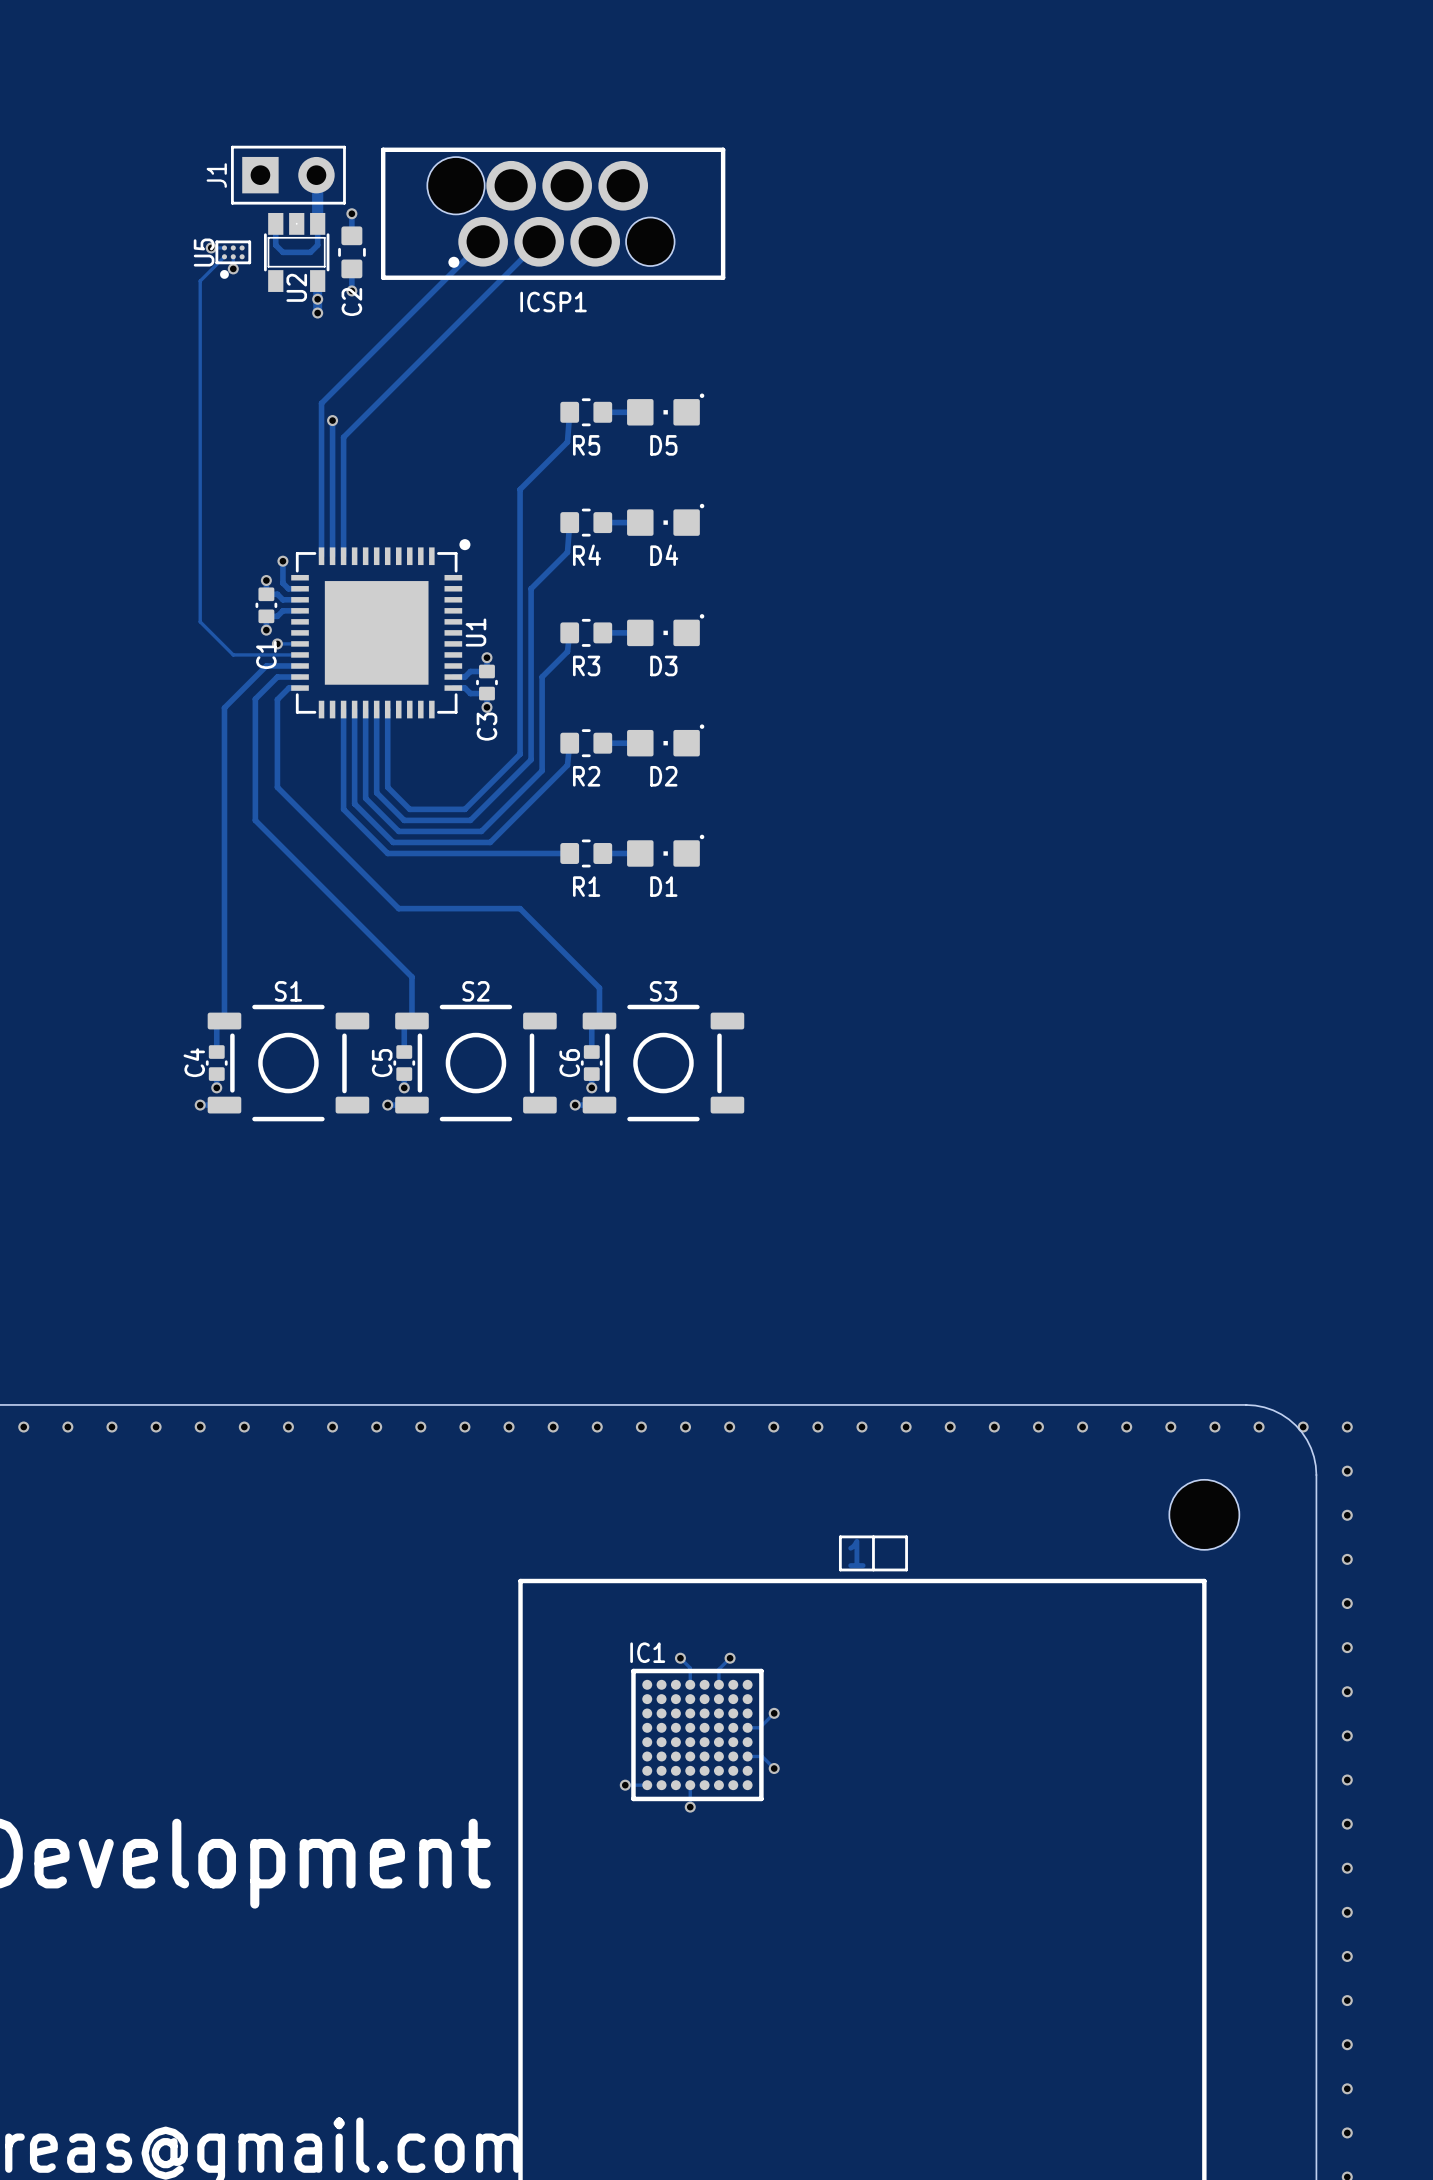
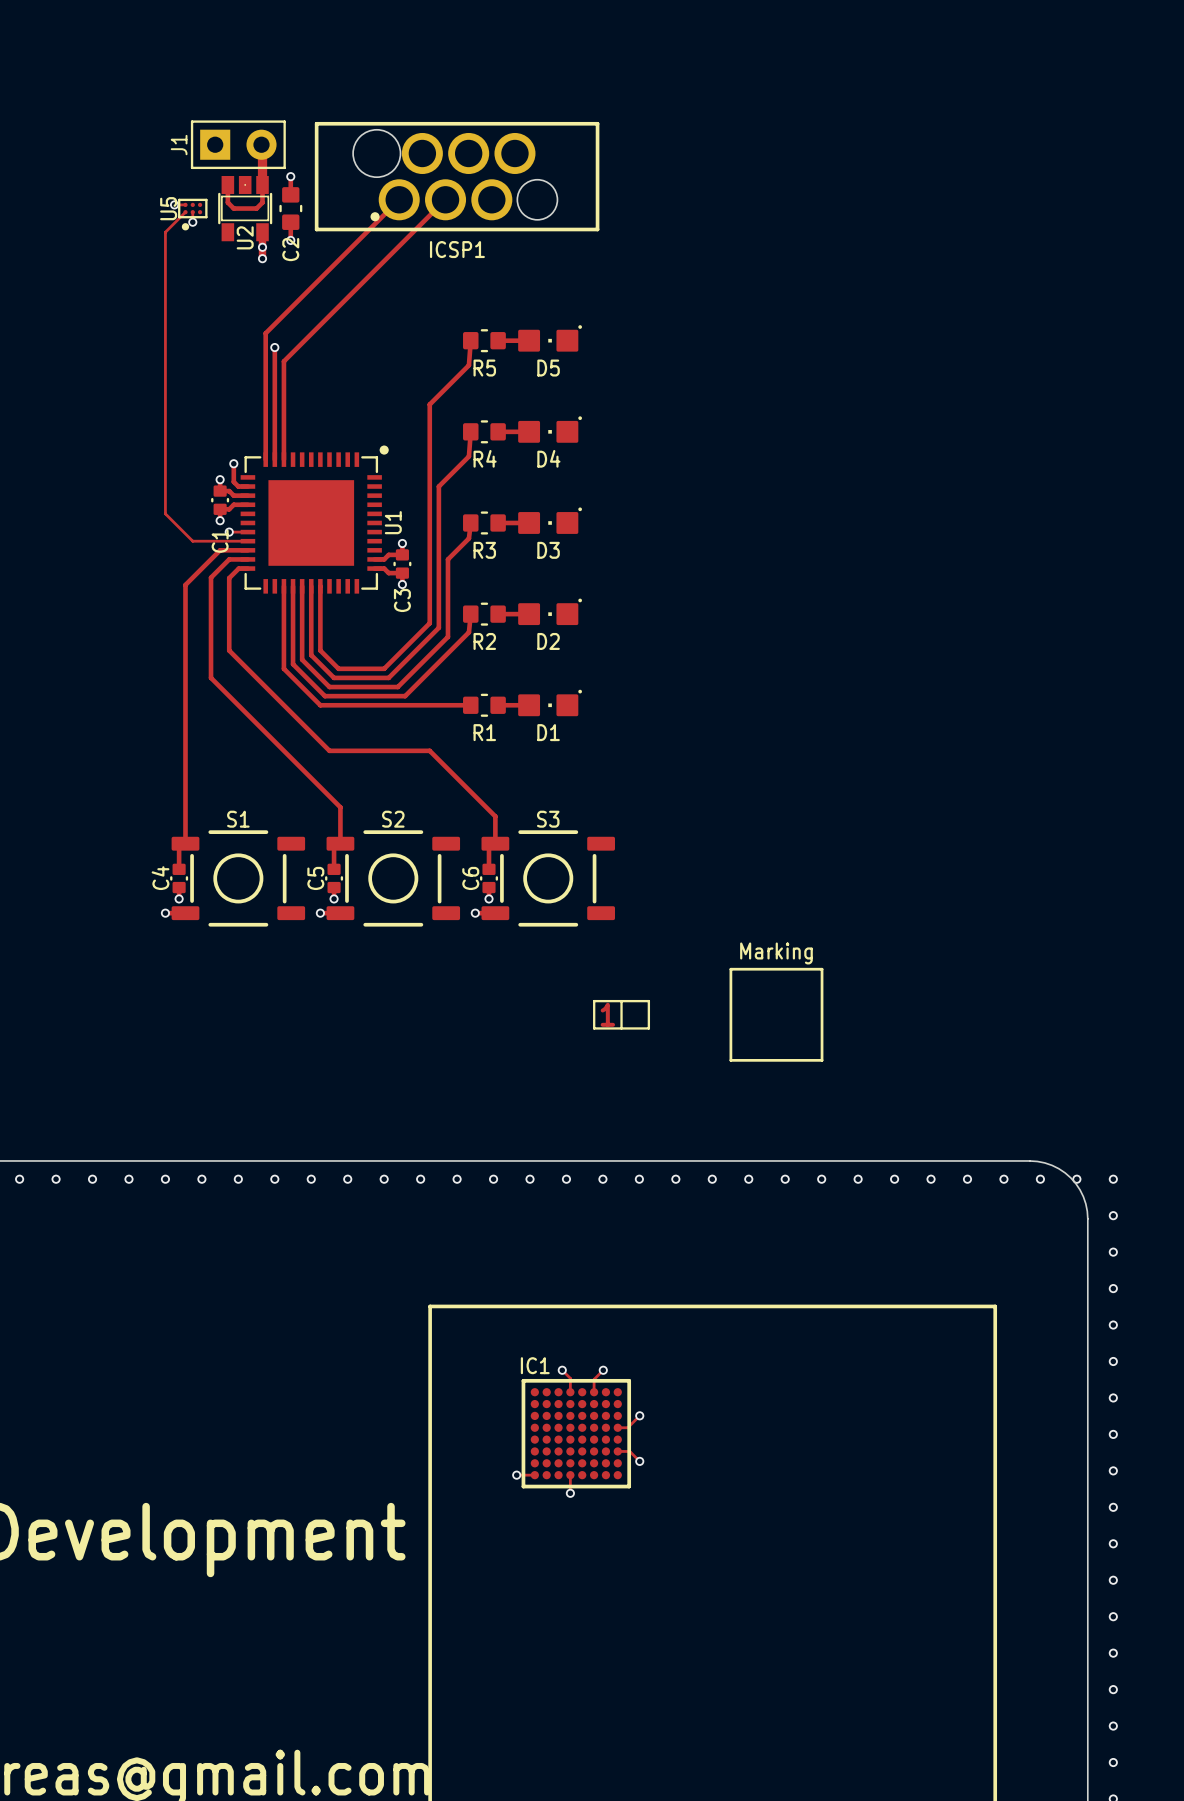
drawing: none -> [729, 967, 824, 1062]
hole: (1204, 1514) -> none
drawing position: (873, 1553) -> (621, 1014)

